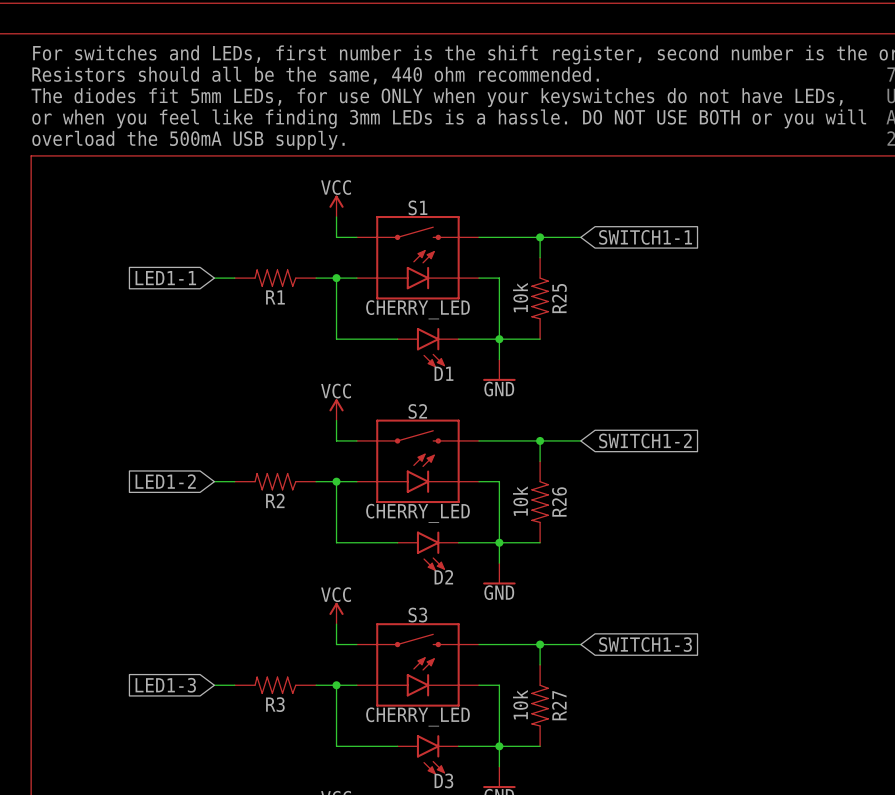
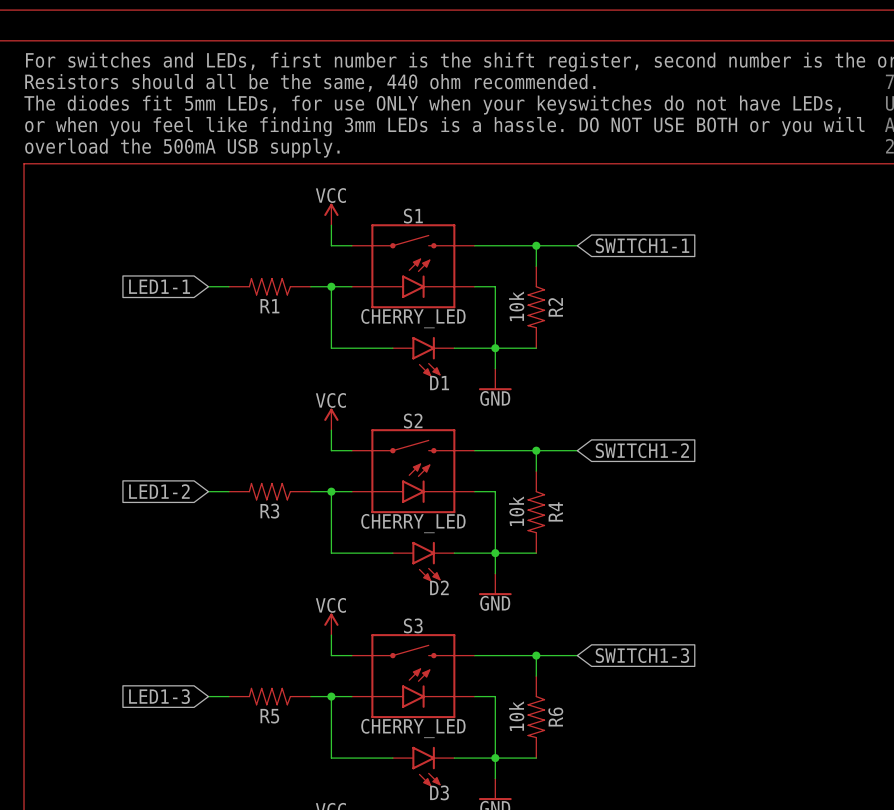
R25 name: R25 (559, 298) -> R2 (555, 307)
R2 name: R2 (275, 500) -> R3 (269, 511)
R26 name: R26 (559, 501) -> R4 (555, 511)
R3 name: R3 (275, 704) -> R5 (269, 716)
R27 name: R27 (559, 705) -> R6 (555, 717)

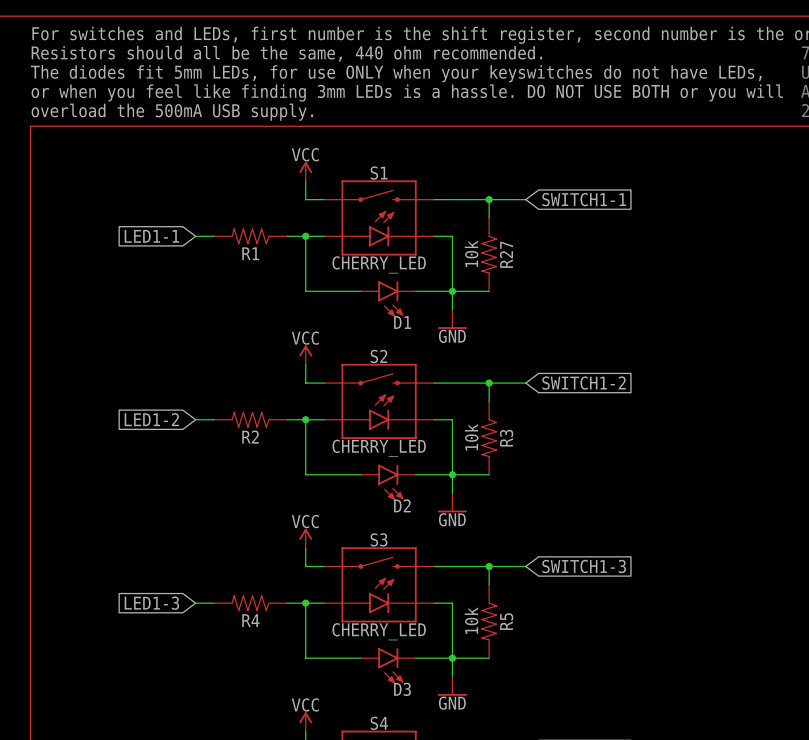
R2 name: R2 (555, 307) -> R27 (506, 254)
R3 name: R3 (269, 511) -> R2 (250, 437)
R4 name: R4 (555, 511) -> R3 (506, 438)
R5 name: R5 (269, 716) -> R4 (250, 620)
R6 name: R6 (555, 717) -> R5 (506, 621)

